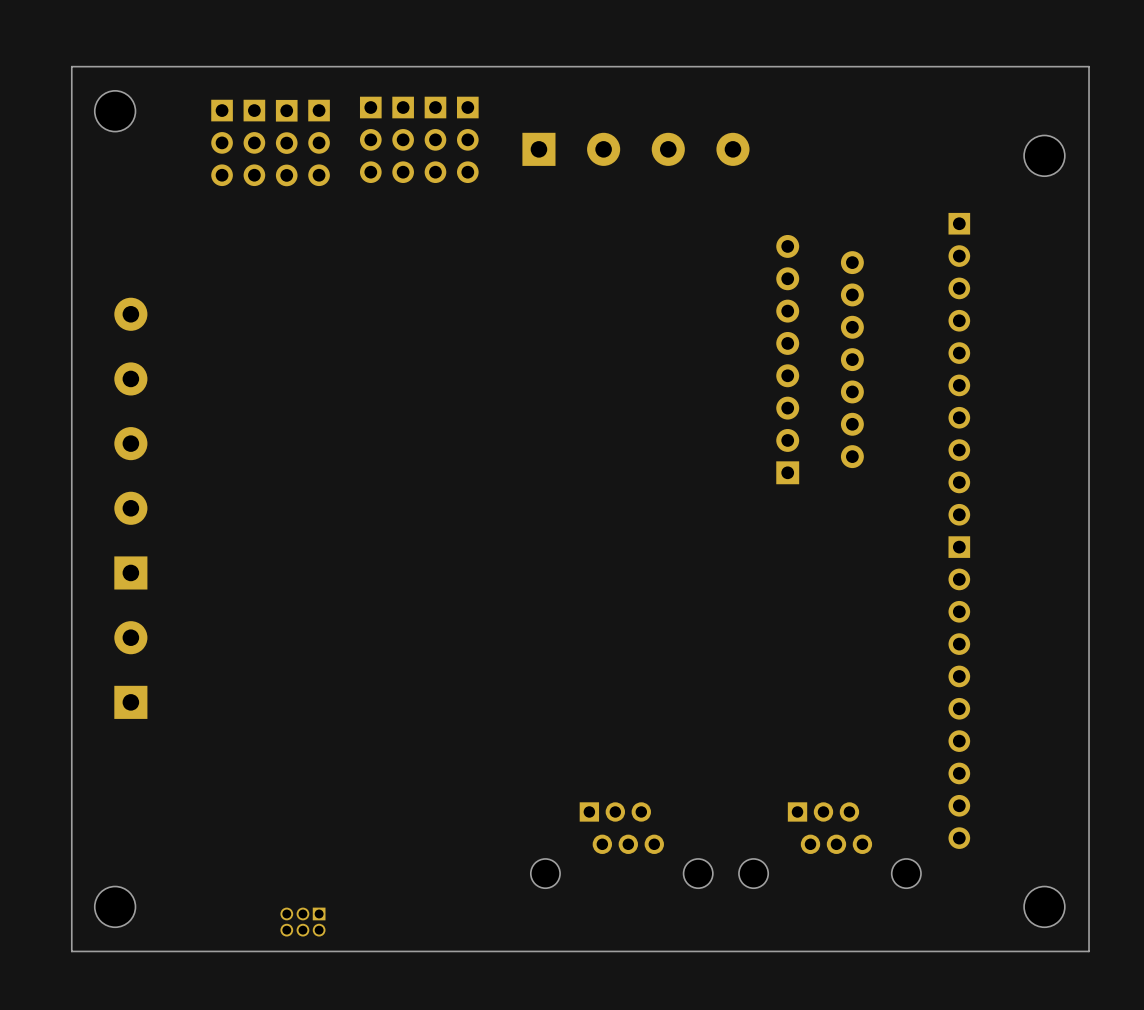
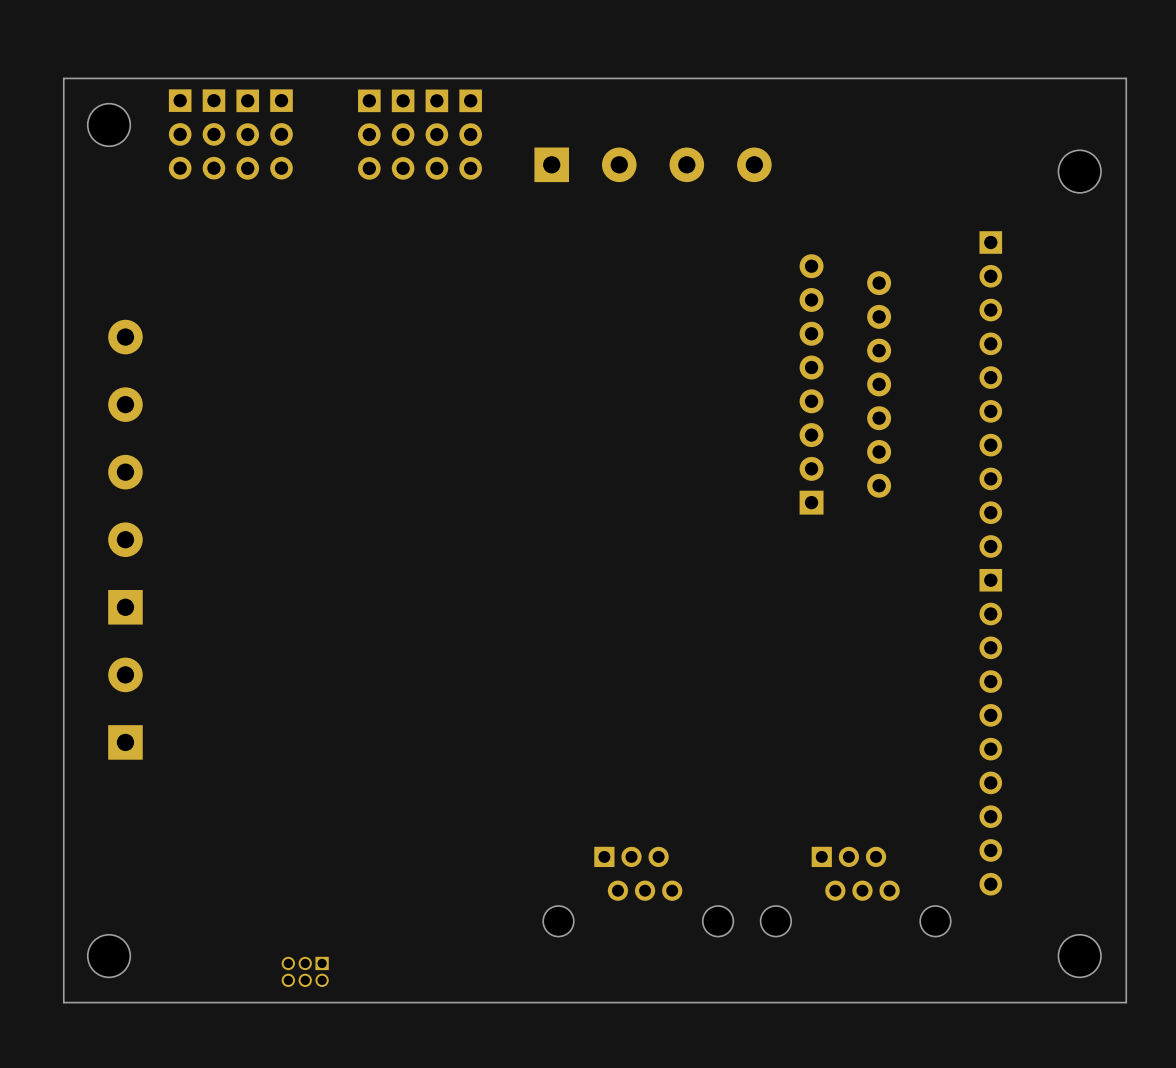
part: none -> (180, 134)
part: none -> (213, 134)
part: none -> (247, 134)
part: none -> (281, 134)
part: none -> (369, 134)
part: none -> (403, 134)
part: none -> (436, 134)
part: none -> (470, 134)
part: (370, 139) -> none
part: (403, 139) -> none
part: (435, 139) -> none
part: (467, 139) -> none
part: (222, 142) -> none
part: (254, 142) -> none
part: (319, 142) -> none
part: (286, 143) -> none

